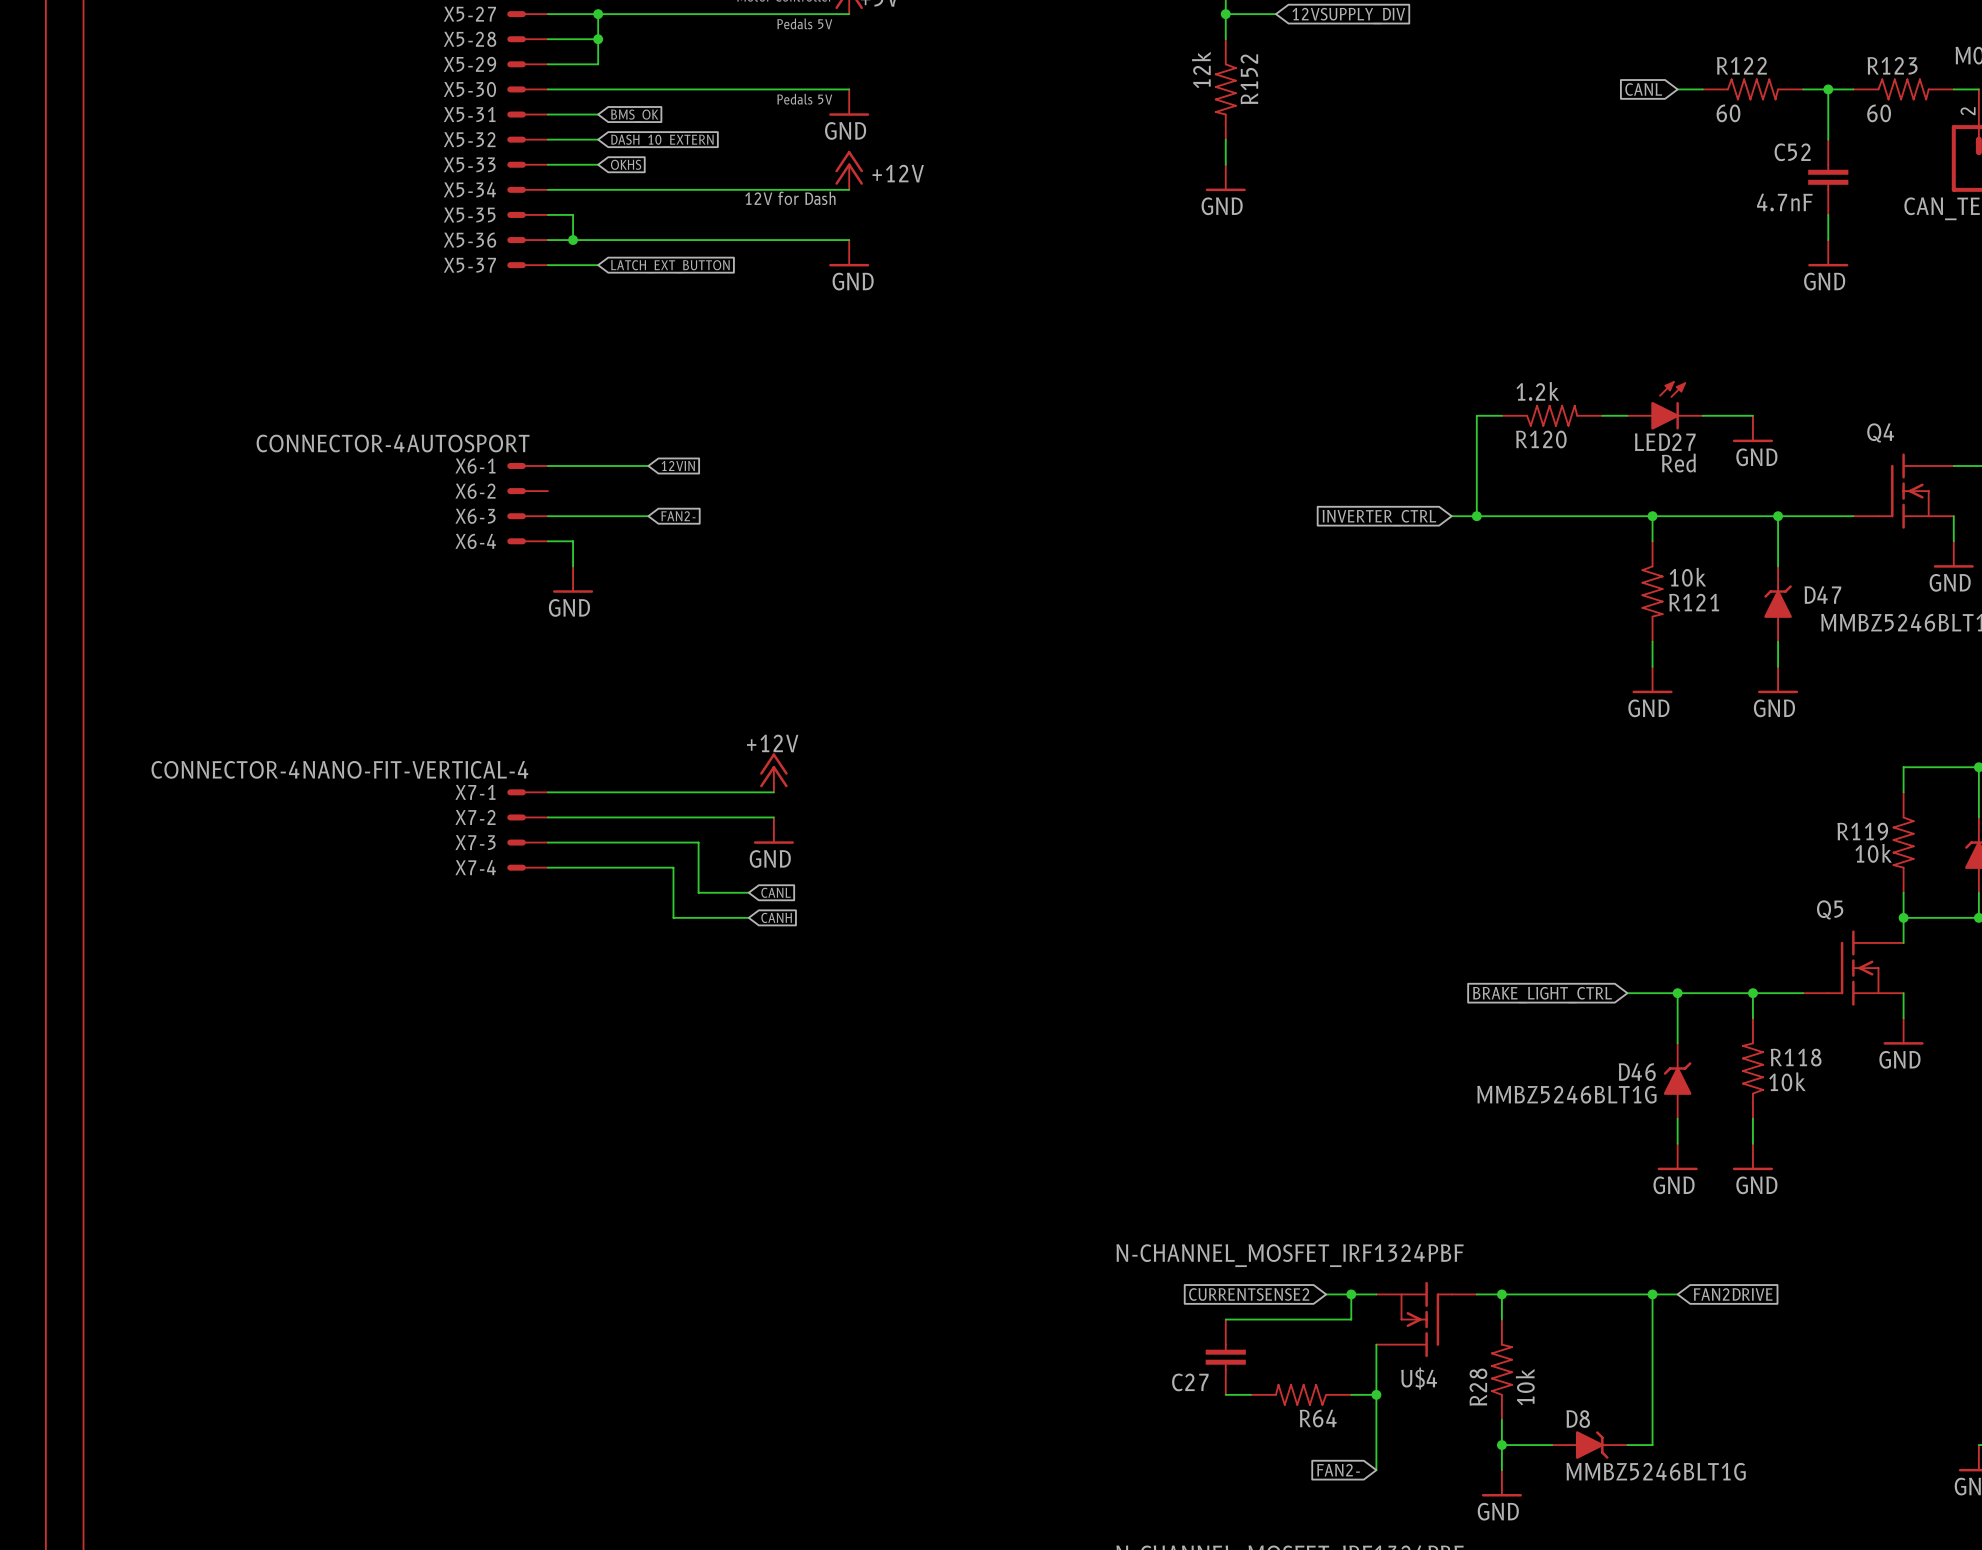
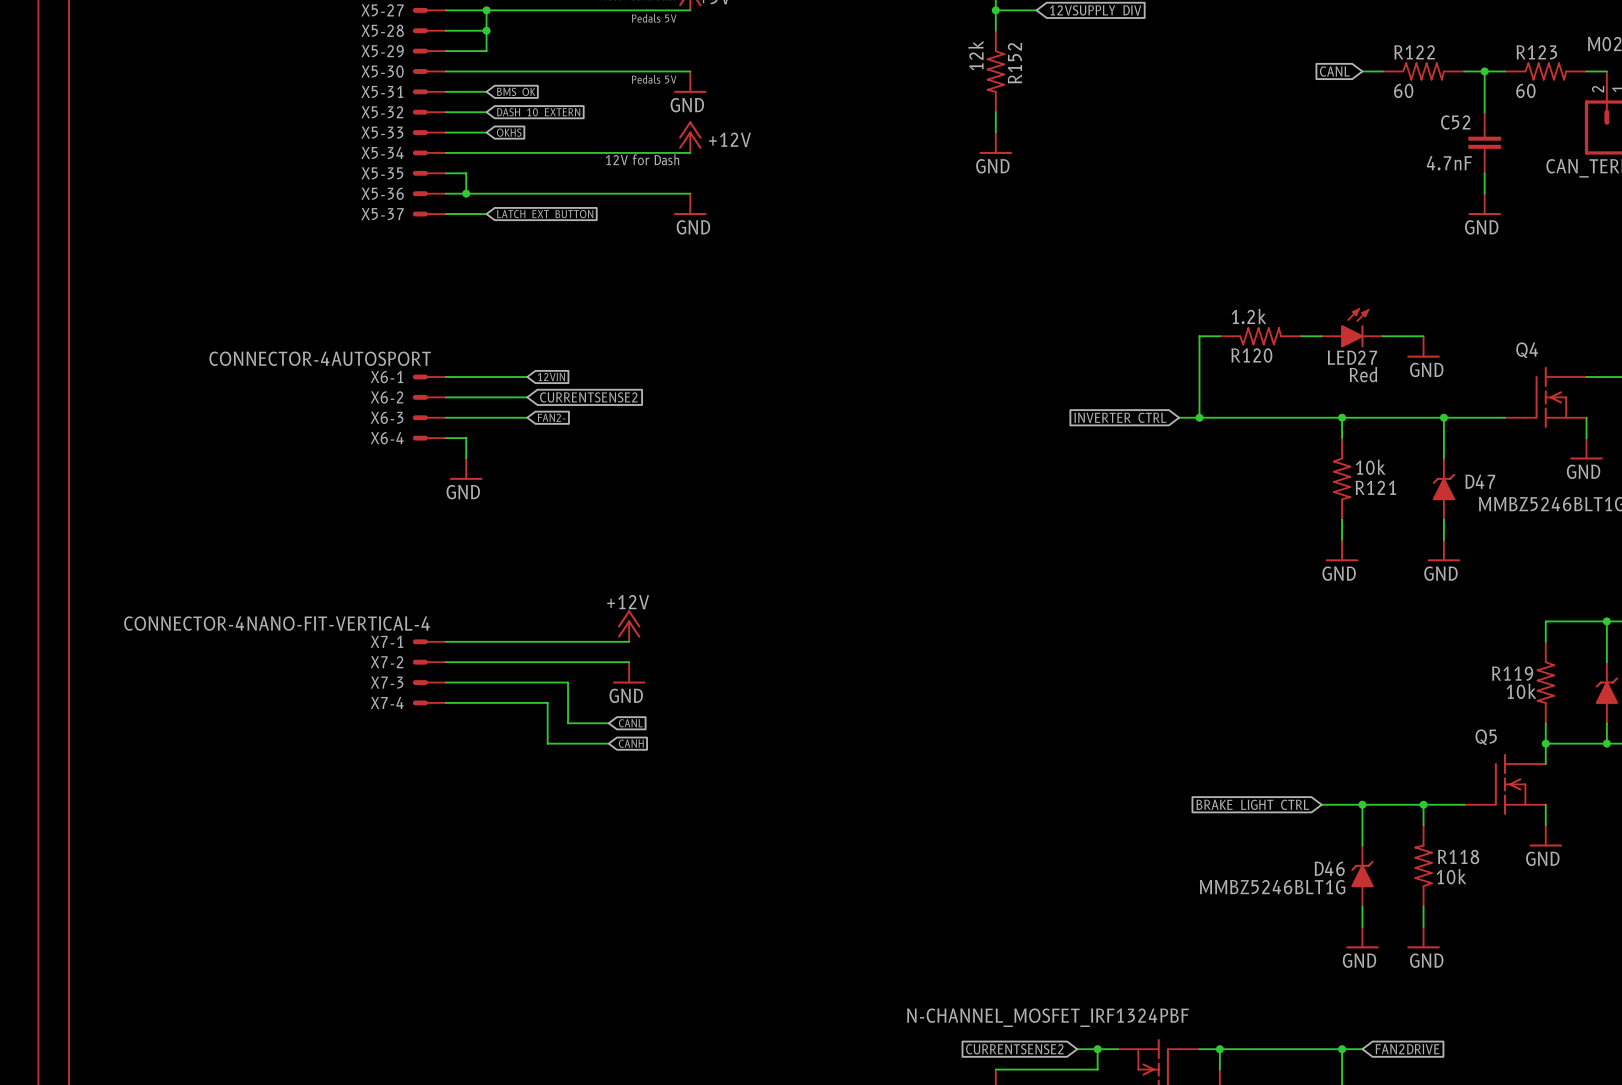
wire: none -> (445, 397) (527, 397)
global label: none -> CURRENTSENSE2 (588, 397)

